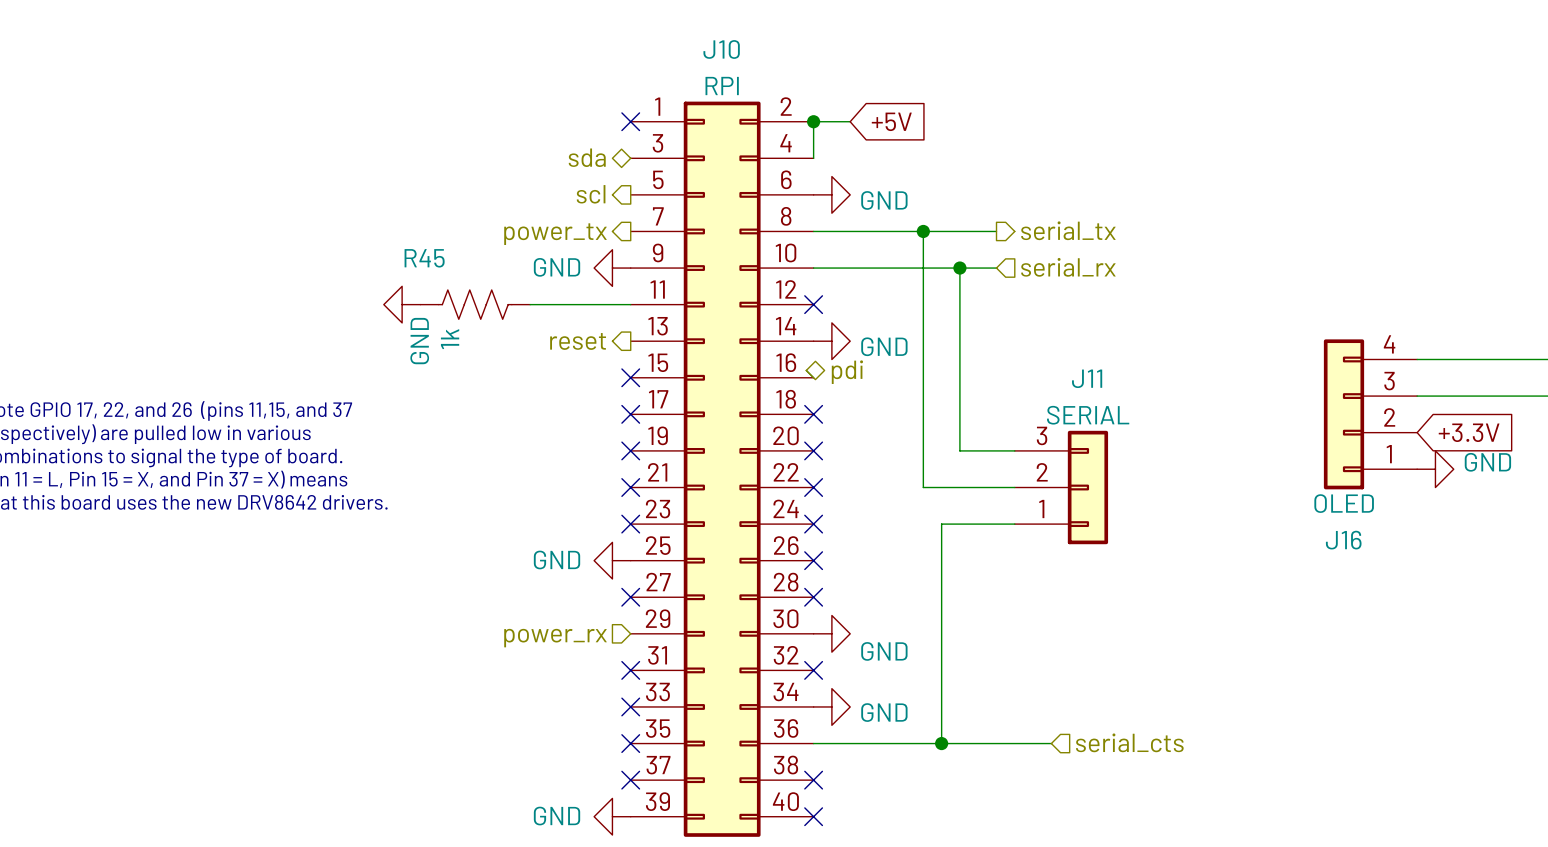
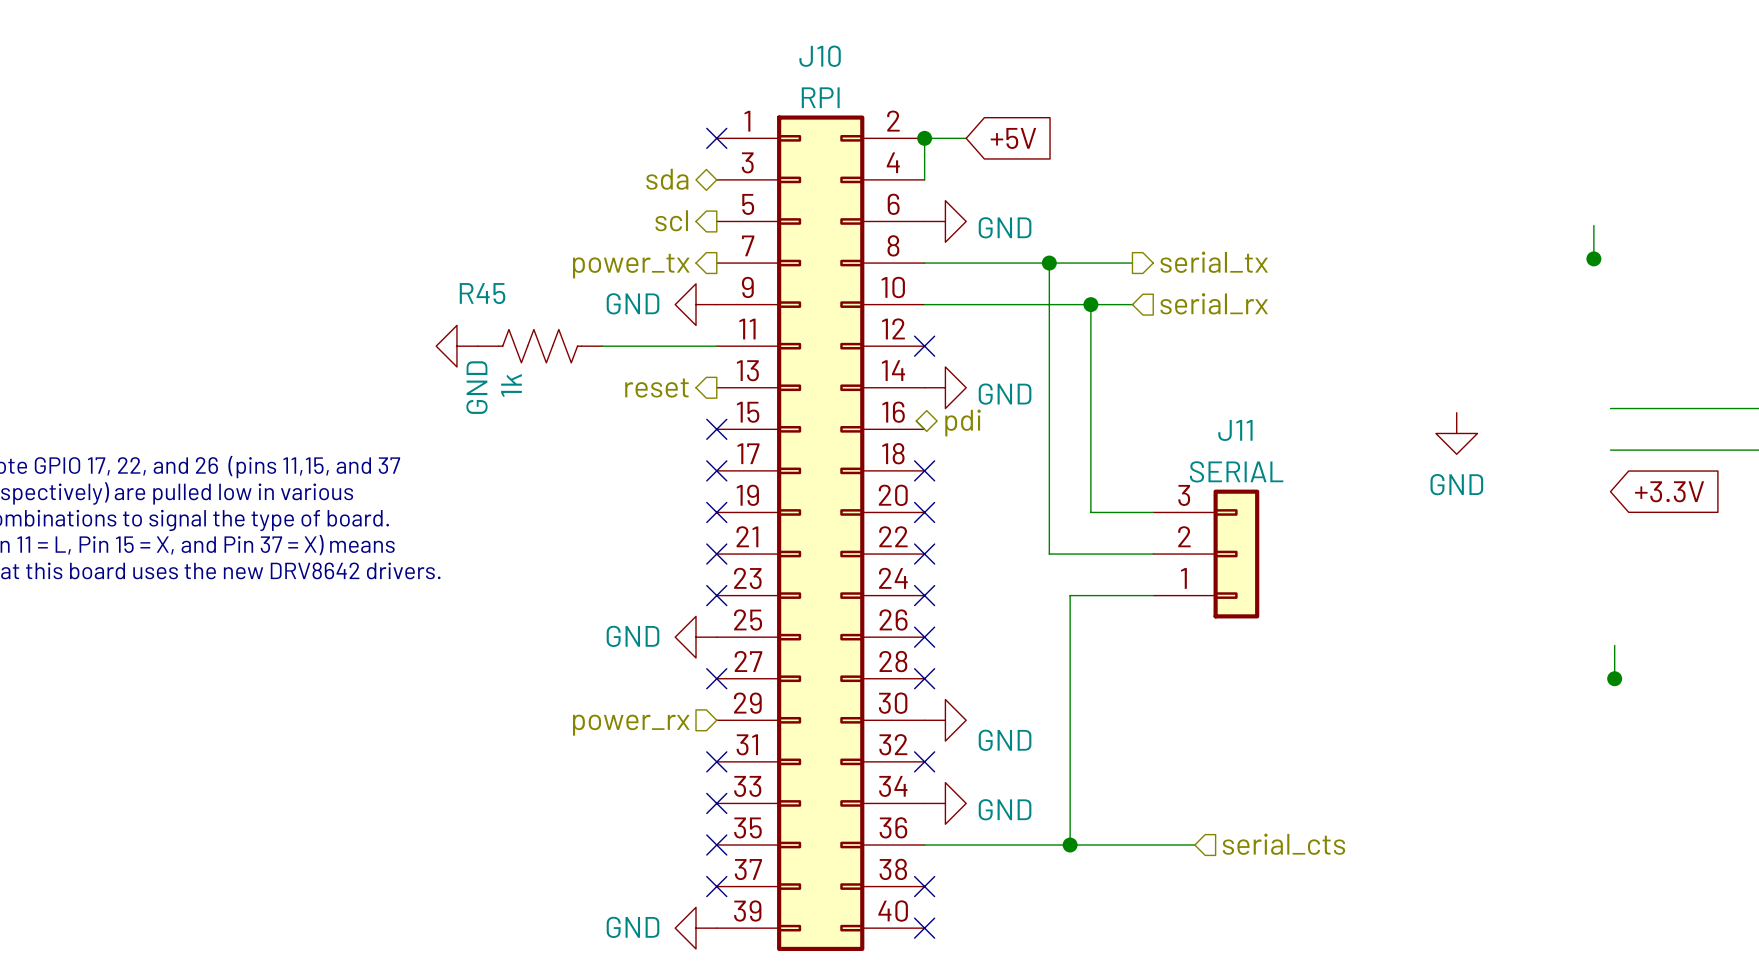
wire: none -> (1593, 225) (1593, 258)
junction: none -> (1593, 258)
J16: OLED (1370, 414) -> none
power symbol rotation: 0° (1435, 469) -> 90° clockwise (1456, 433)
power symbol position: GND (1435, 469) -> GND (1456, 433)
wire: none -> (1614, 645) (1614, 678)
junction: none -> (1614, 678)

